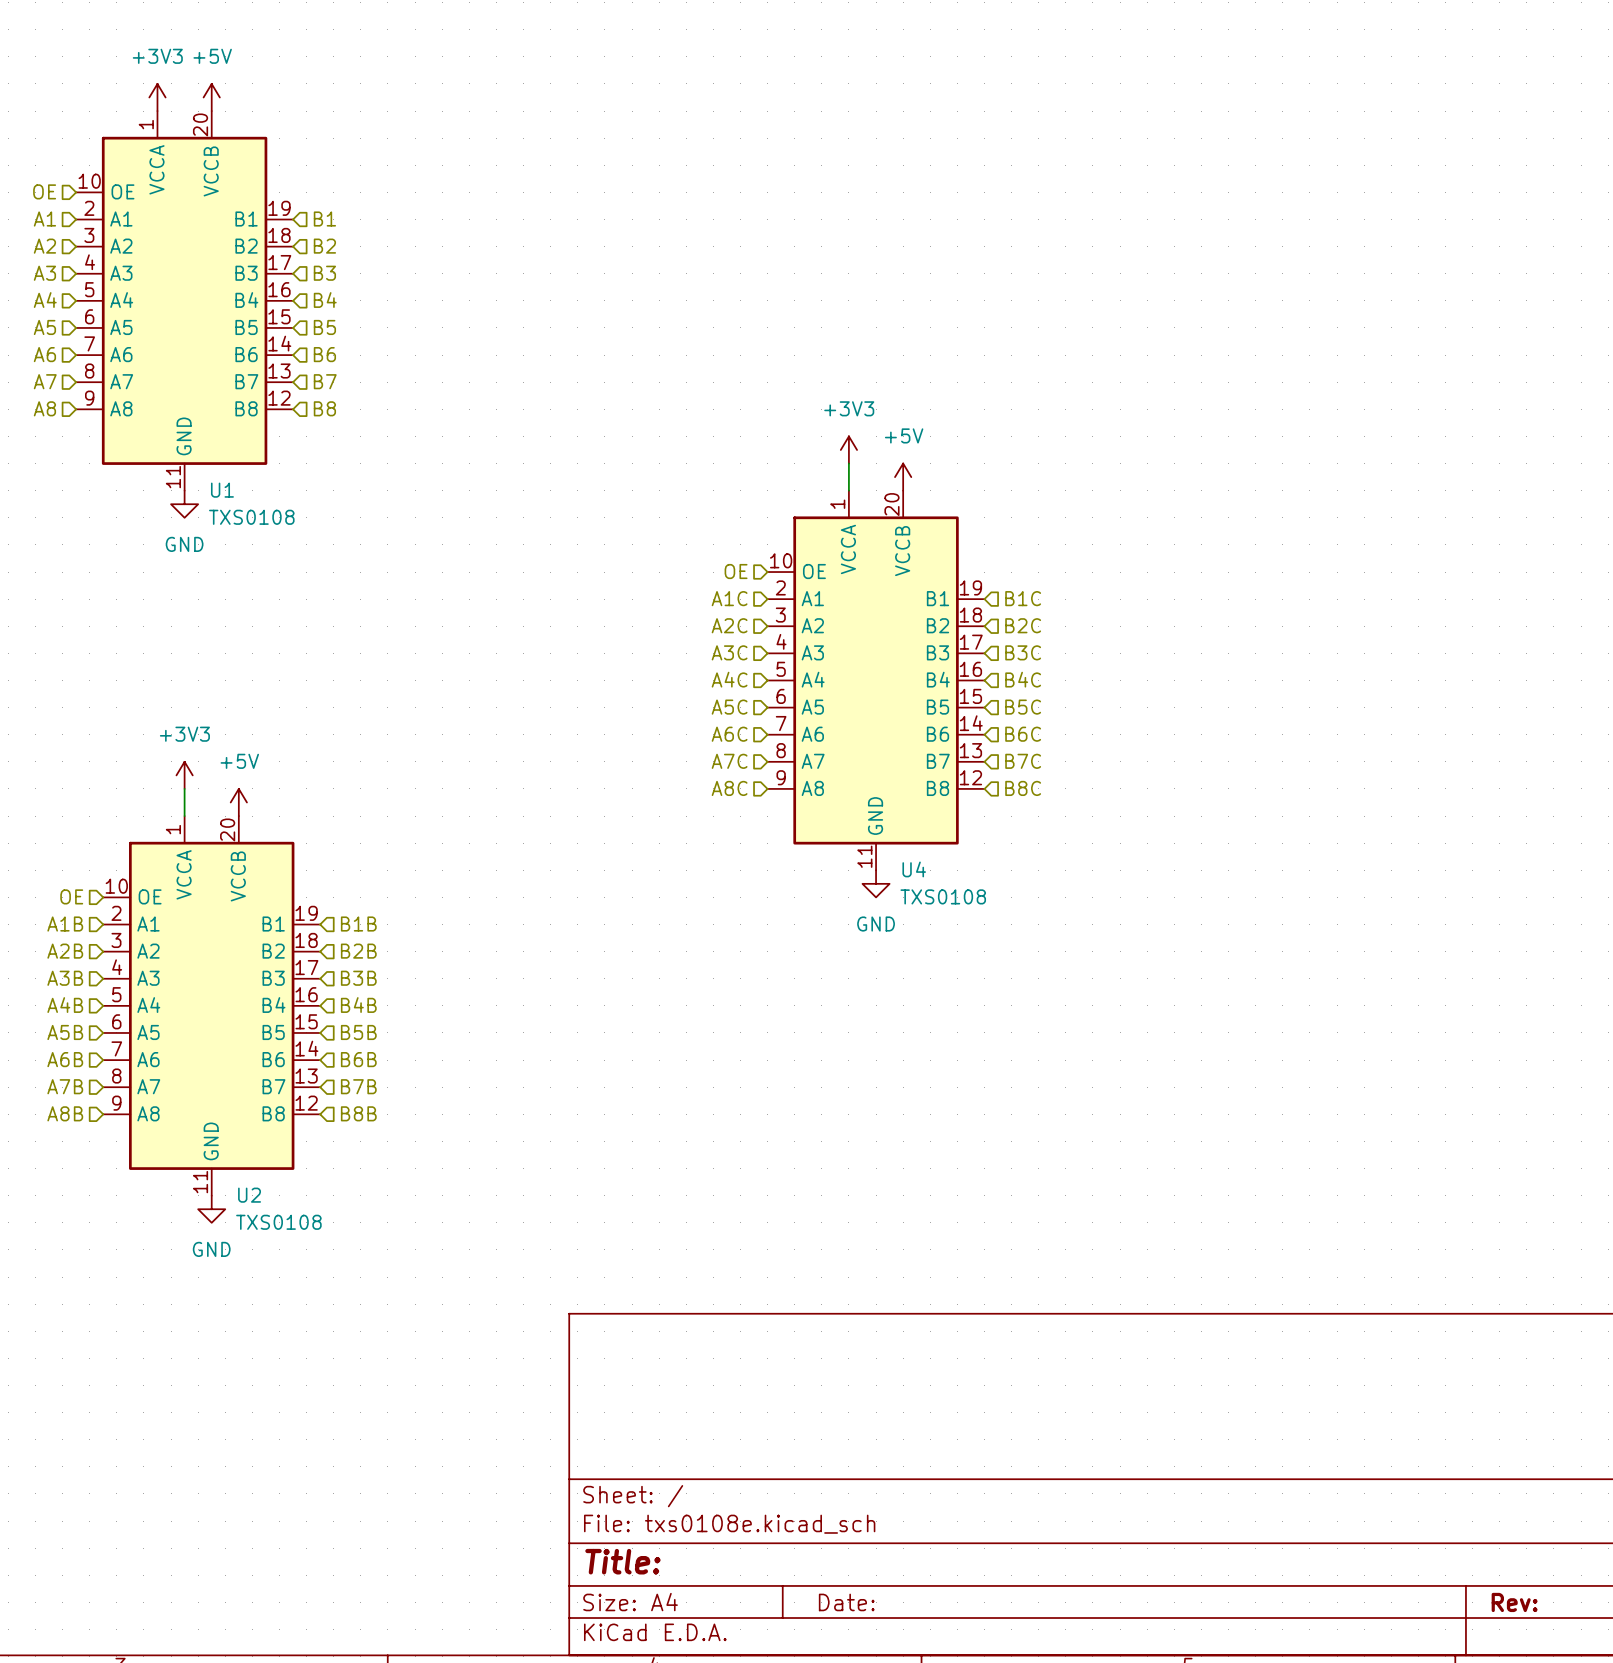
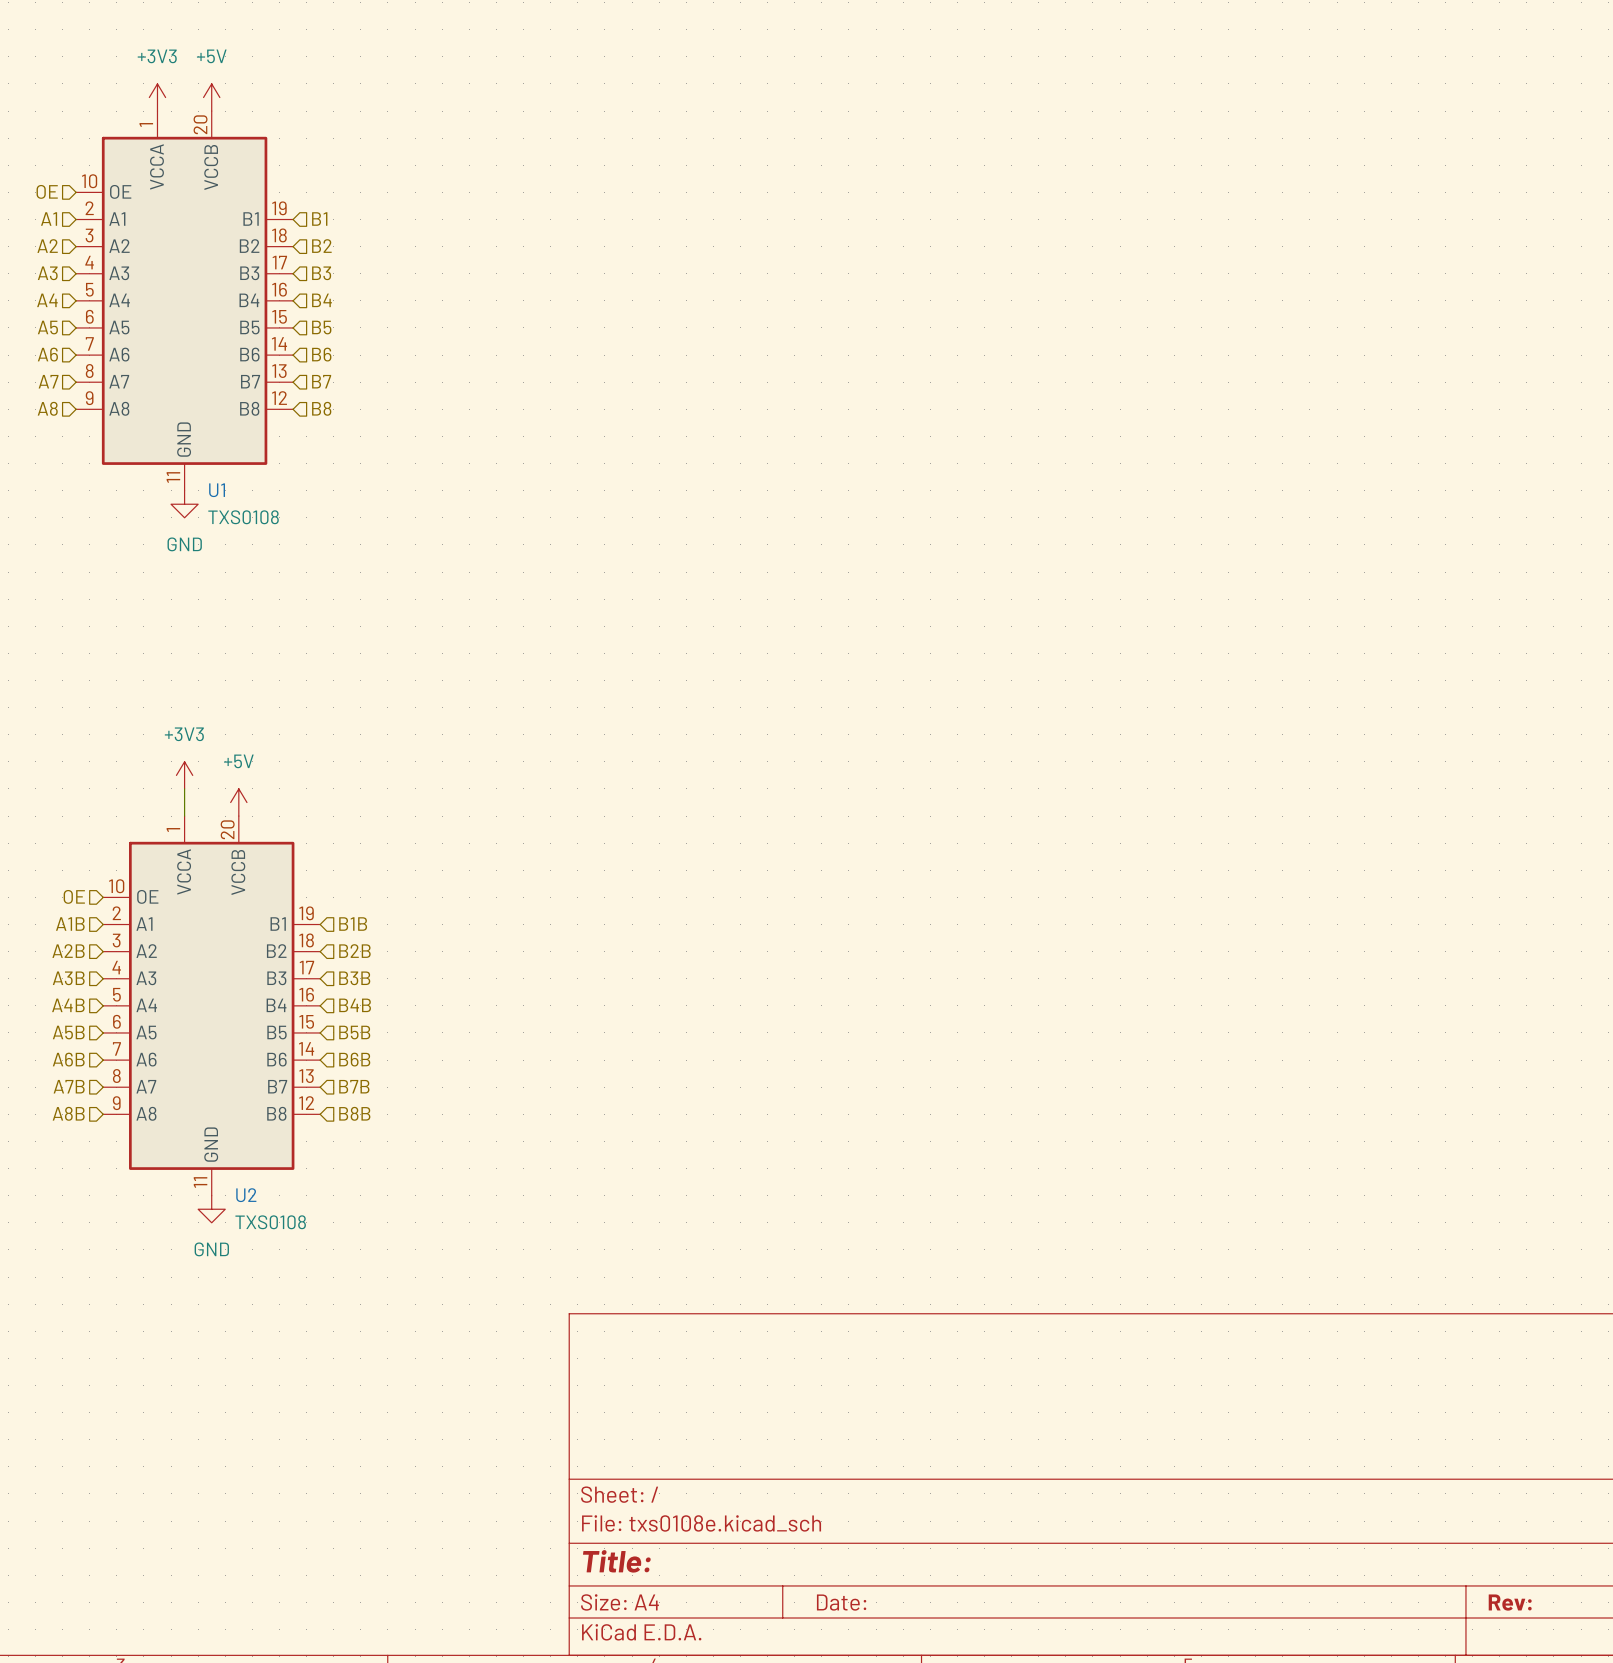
power symbol: +3V3 (848, 449) -> none
wire: (848, 463) (848, 490) -> none
power symbol: +5V (903, 477) -> none
hierarchical label: OE (736, 571) -> none
hierarchical label: A1C (729, 598) -> none
hierarchical label: B1C (1023, 598) -> none
hierarchical label: A2C (729, 625) -> none
hierarchical label: B2C (1023, 625) -> none
hierarchical label: A3C (729, 652) -> none
hierarchical label: B3C (1023, 652) -> none
hierarchical label: A4C (729, 679) -> none
hierarchical label: B4C (1023, 679) -> none
U4: TXS0108 (876, 680) -> none
hierarchical label: A5C (729, 707) -> none
hierarchical label: B5C (1023, 707) -> none
hierarchical label: A6C (729, 734) -> none
hierarchical label: B6C (1023, 734) -> none
hierarchical label: A7C (729, 761) -> none
hierarchical label: B7C (1023, 761) -> none
hierarchical label: A8C (729, 788) -> none
hierarchical label: B8C (1023, 788) -> none
power symbol: GND (876, 883) -> none

